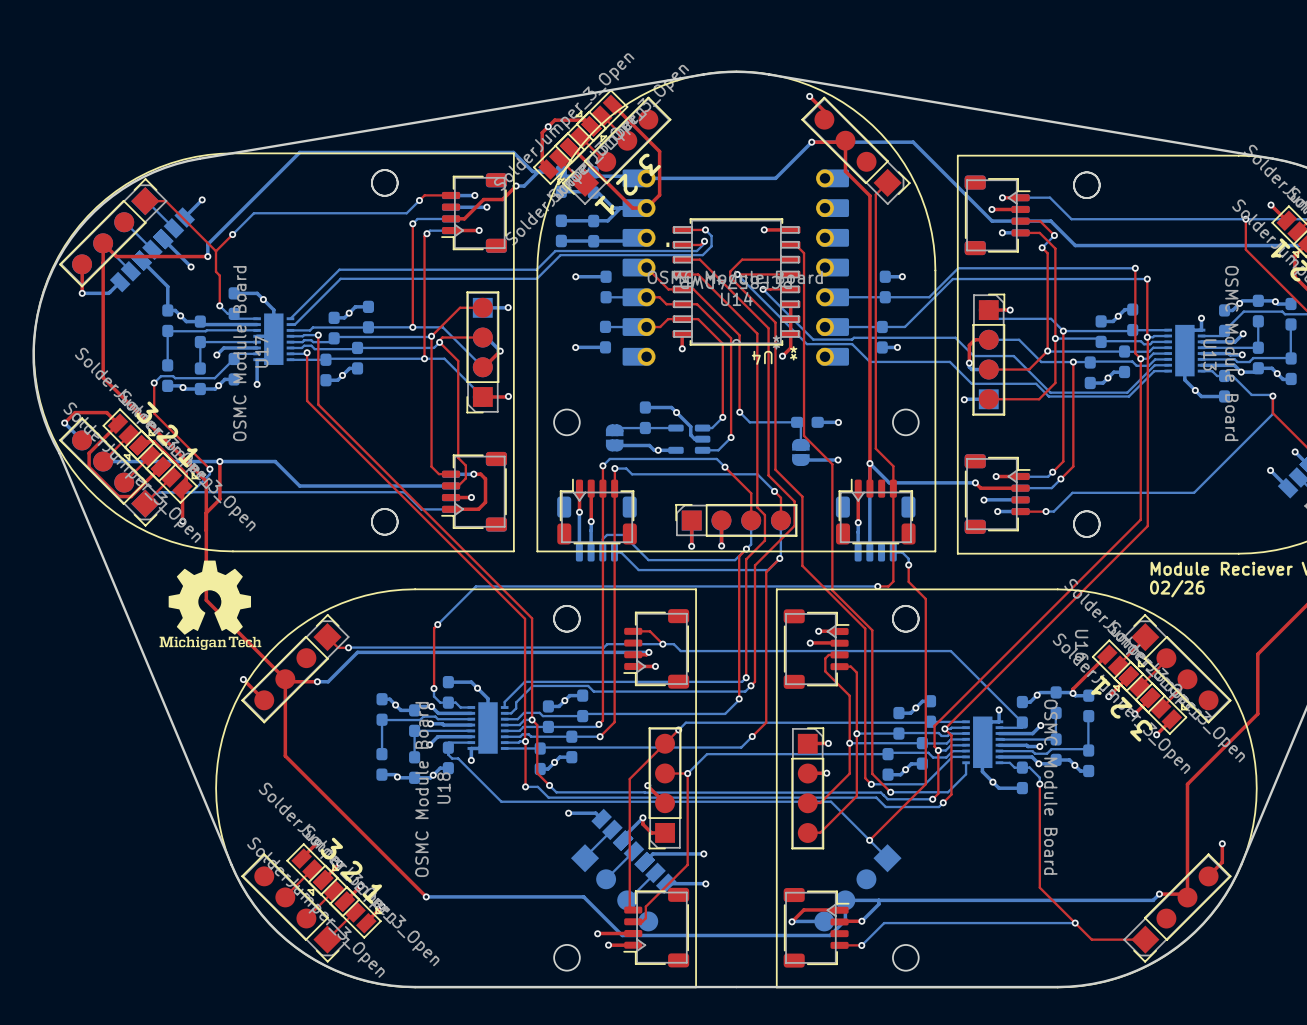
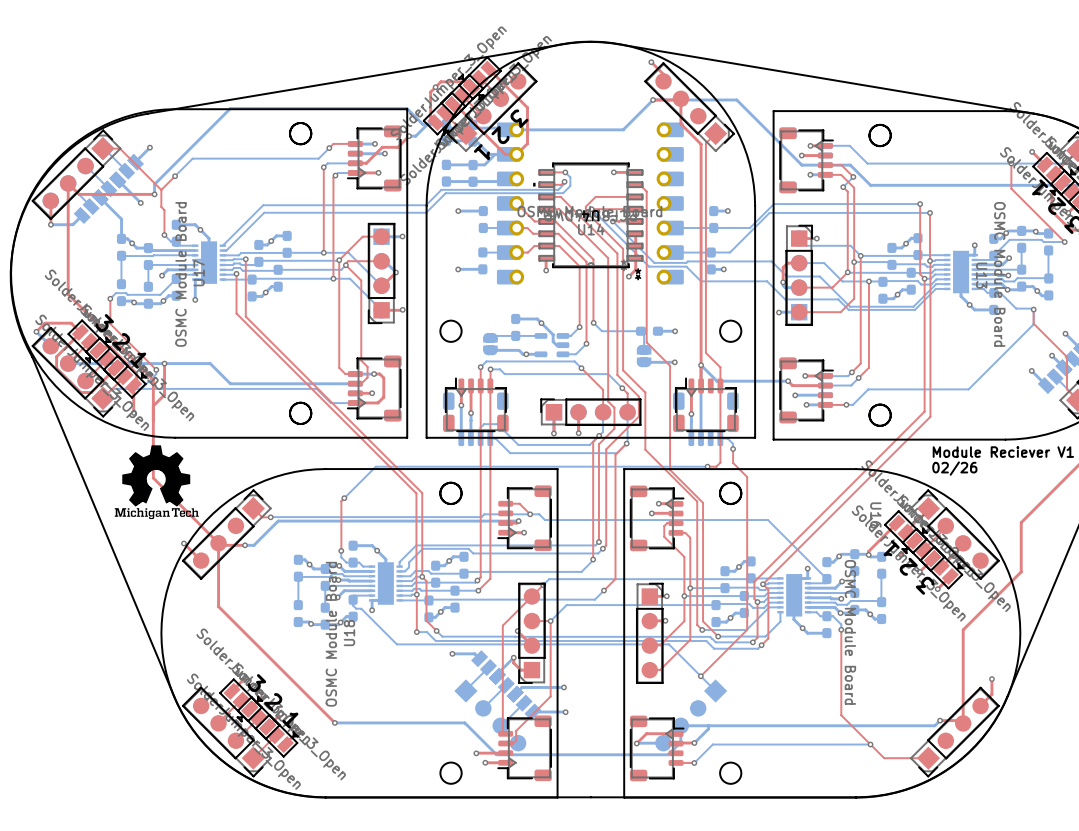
U4 name position: U4 (762, 357) -> U4 (590, 215)

